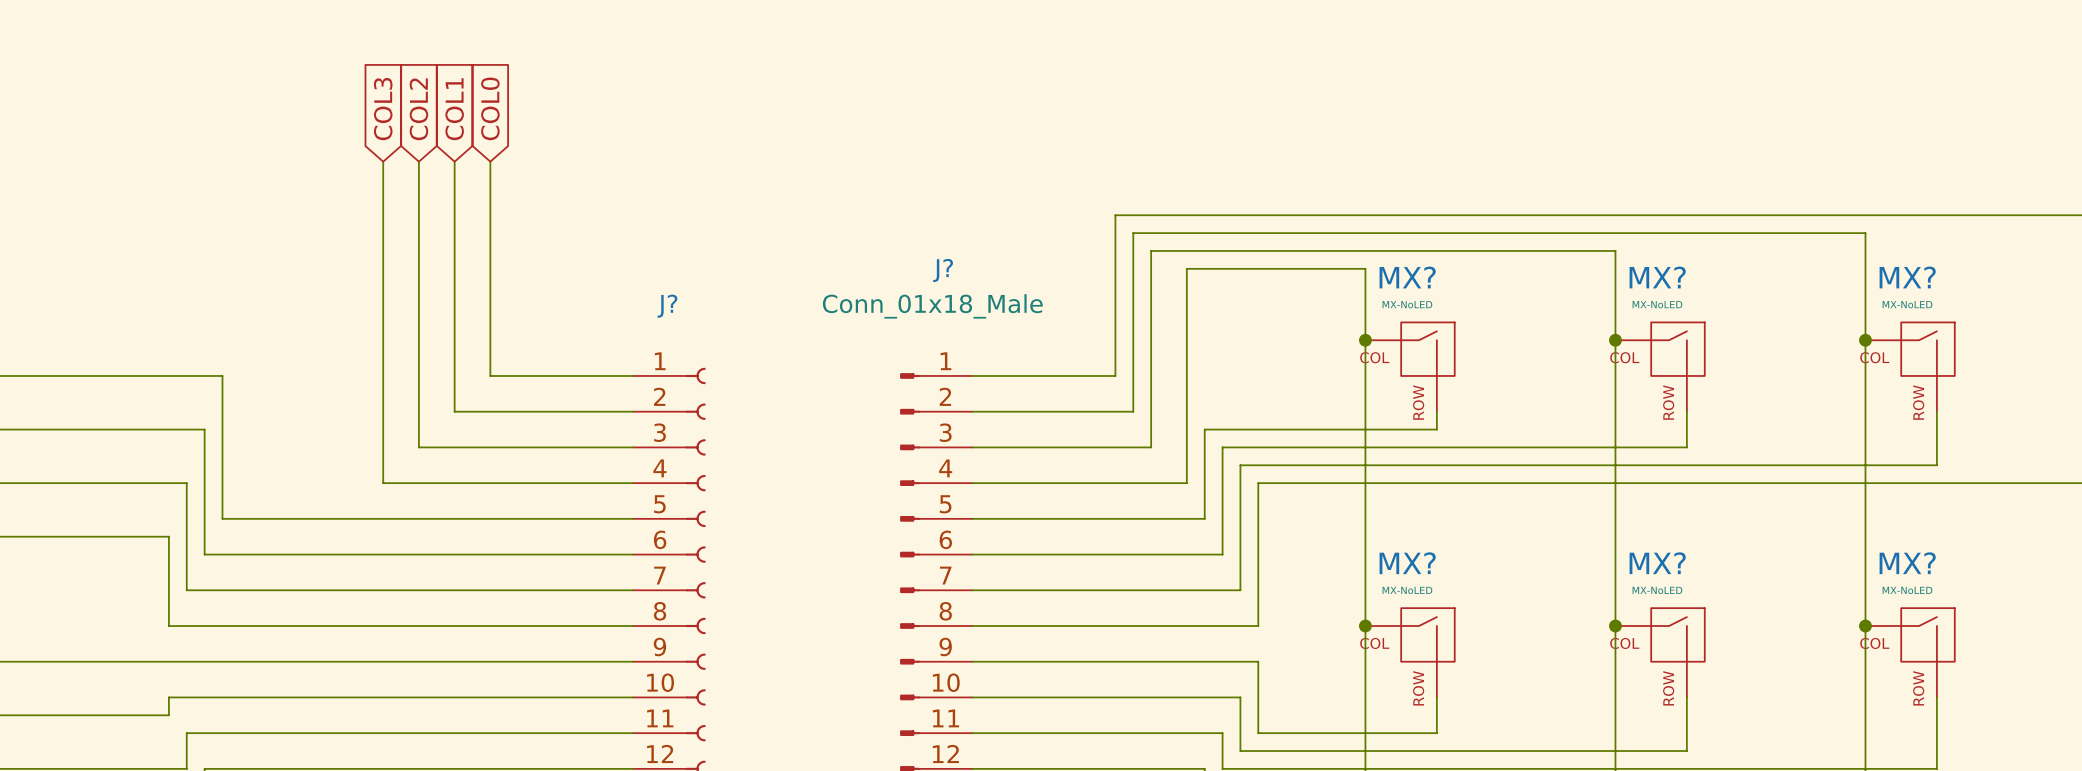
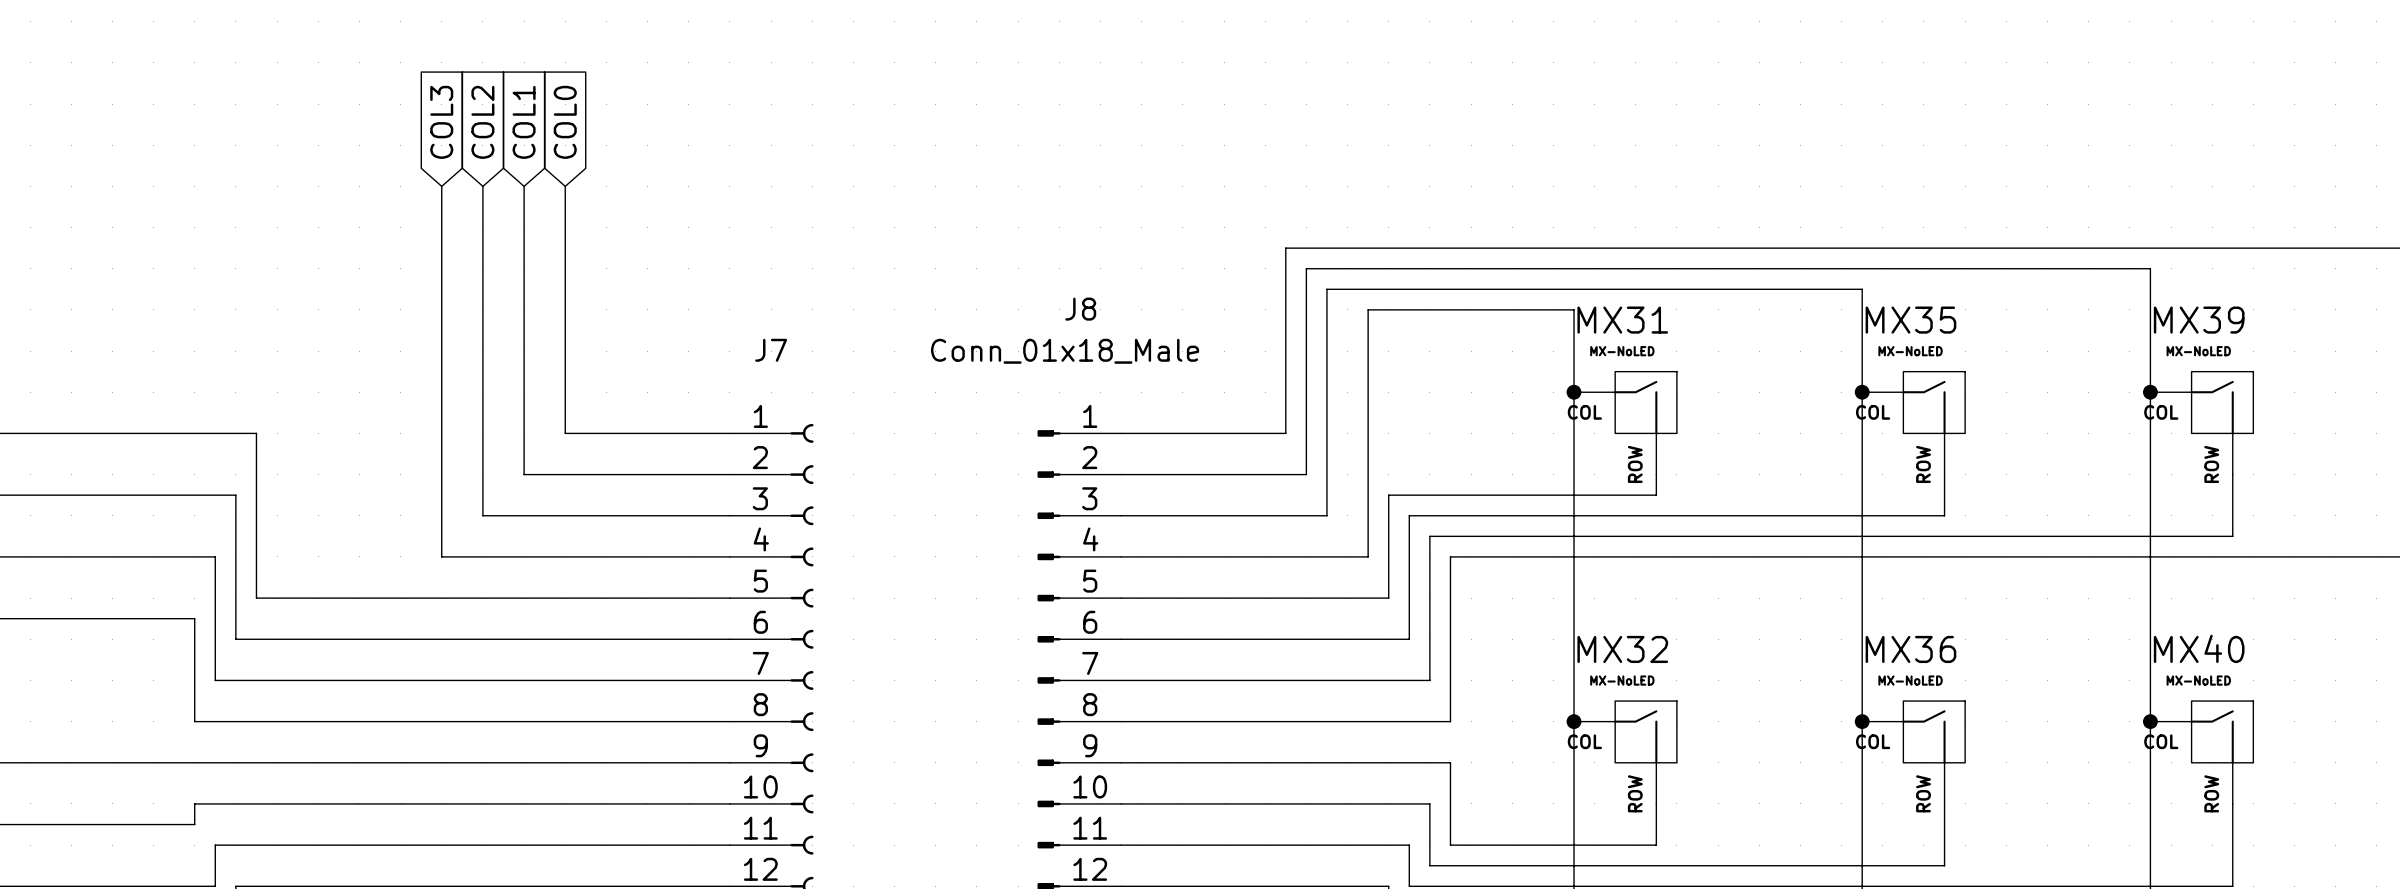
J? name: J? (943, 270) -> J8 (1080, 309)
MX? name: MX? (1407, 277) -> MX31 (1622, 320)
MX? name: MX? (1657, 277) -> MX35 (1910, 320)
MX? name: MX? (1907, 277) -> MX39 (2199, 320)
J? name: J? (667, 306) -> J7 (771, 350)
MX? name: MX? (1407, 563) -> MX32 (1622, 649)
MX? name: MX? (1657, 563) -> MX36 (1910, 649)
MX? name: MX? (1907, 563) -> MX40 (2199, 648)

